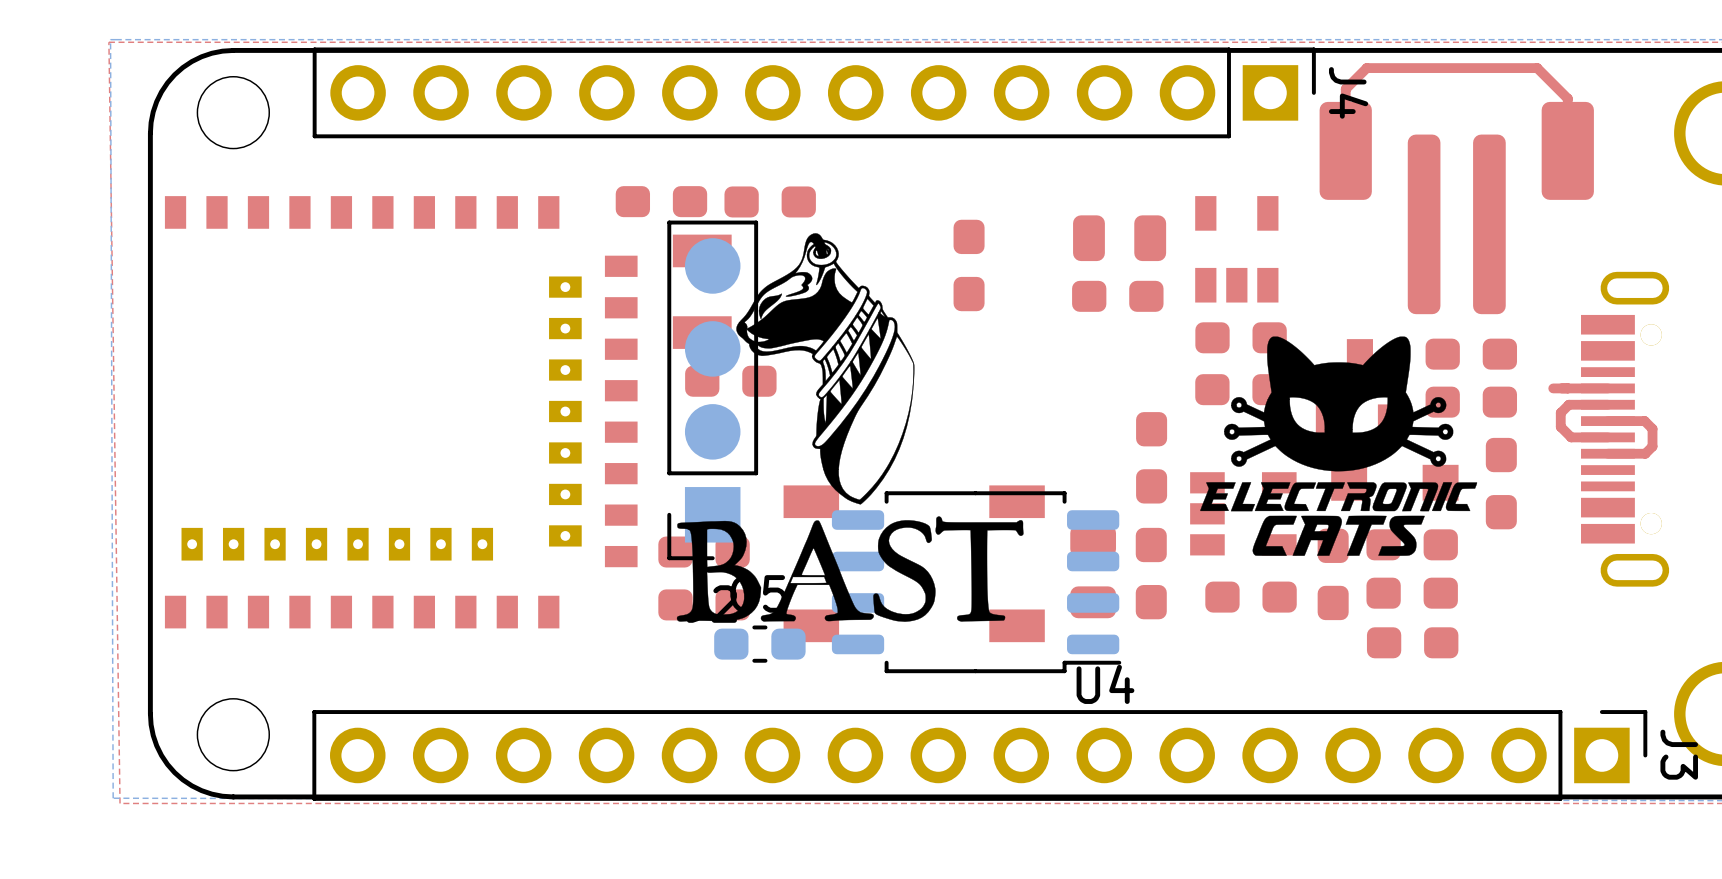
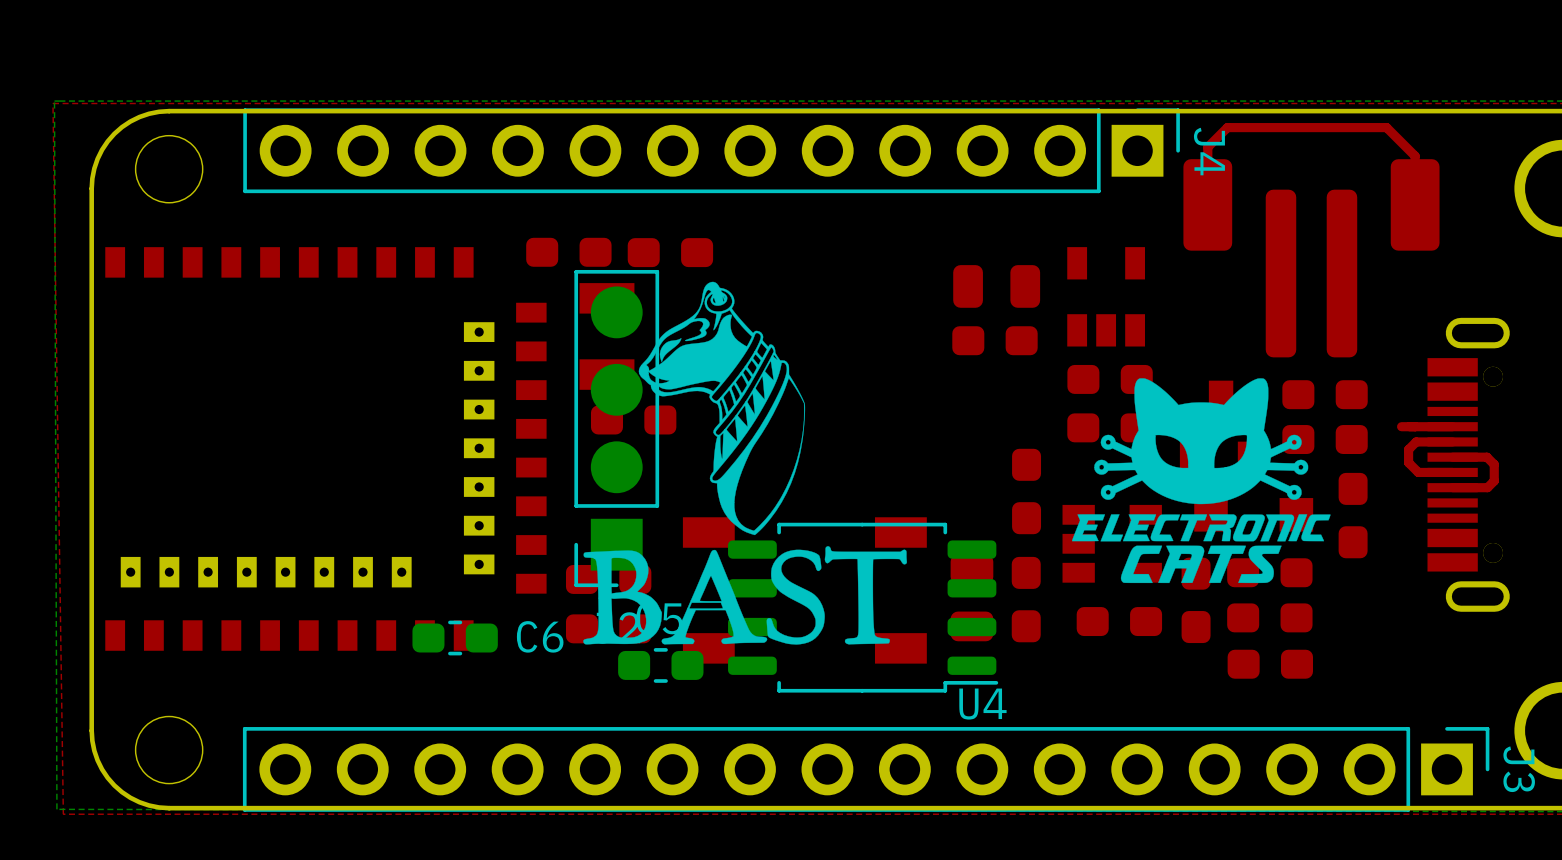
C6 side: top (969, 265) -> bottom (455, 638)

